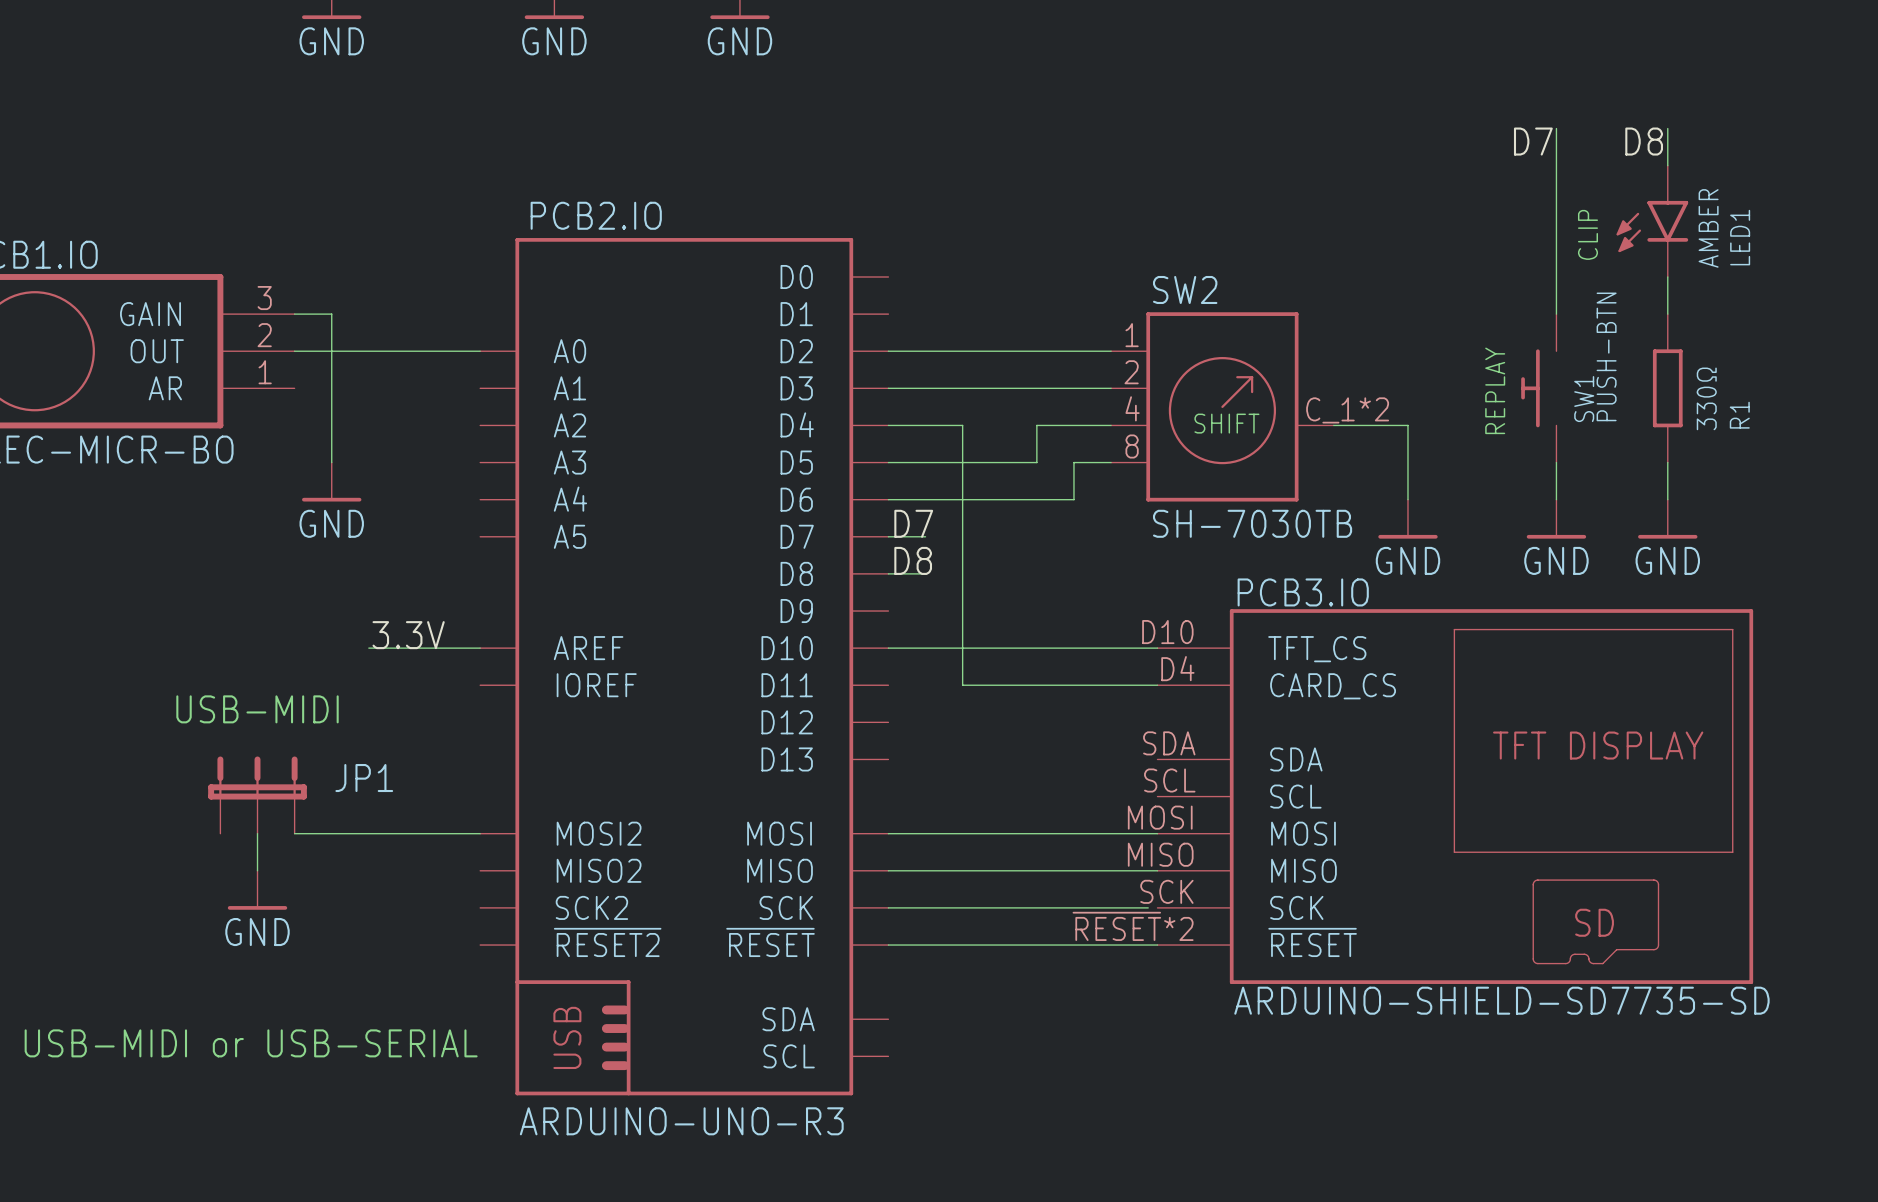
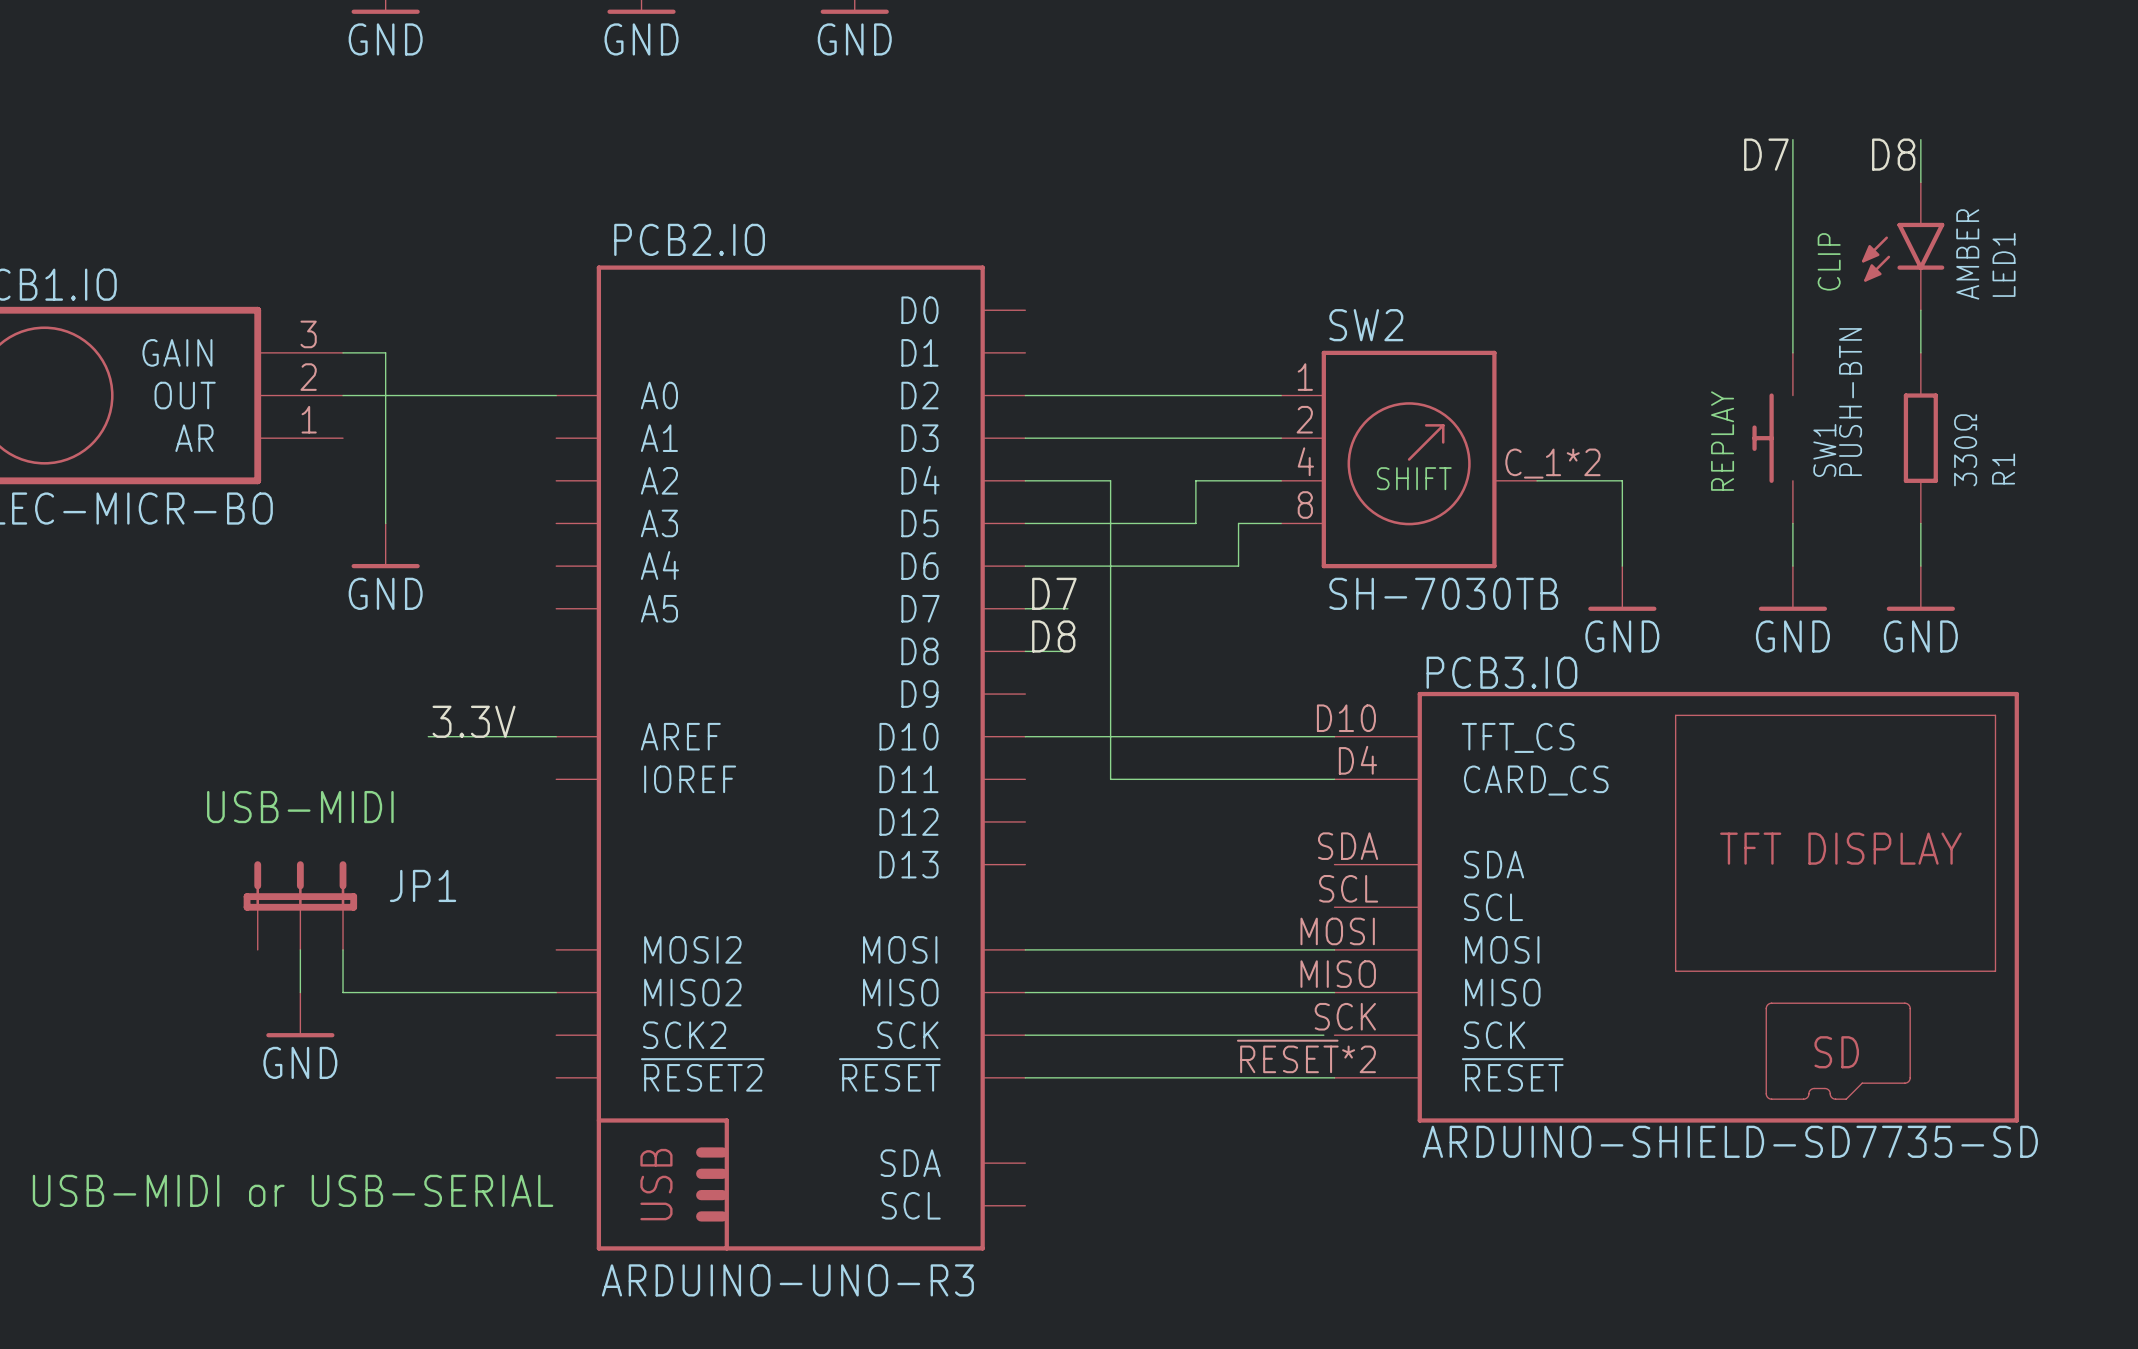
wire: (294, 833) (480, 833) -> (343, 949) (343, 992) (556, 992)

